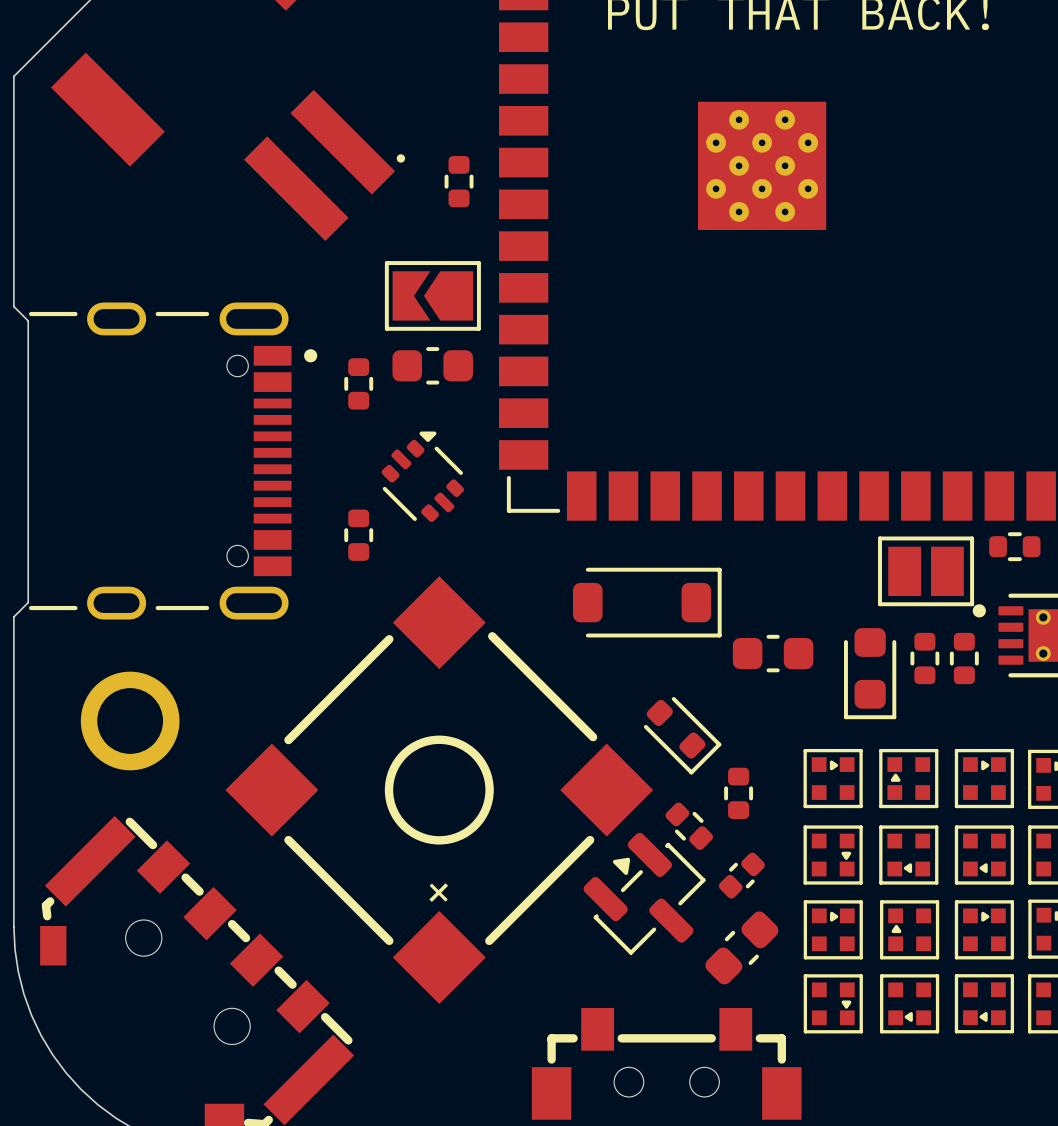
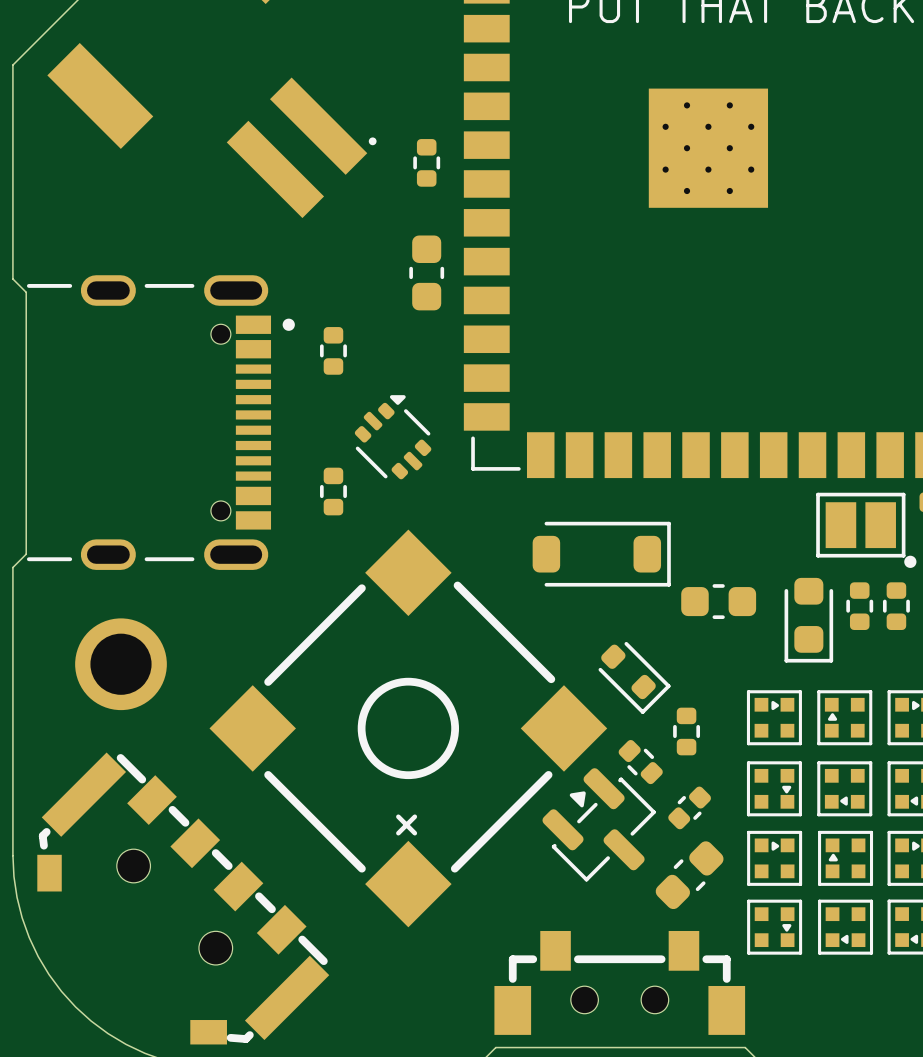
part footprint: [384, 261, 481, 331] -> [409, 235, 445, 311]
part: (432, 365) -> none

